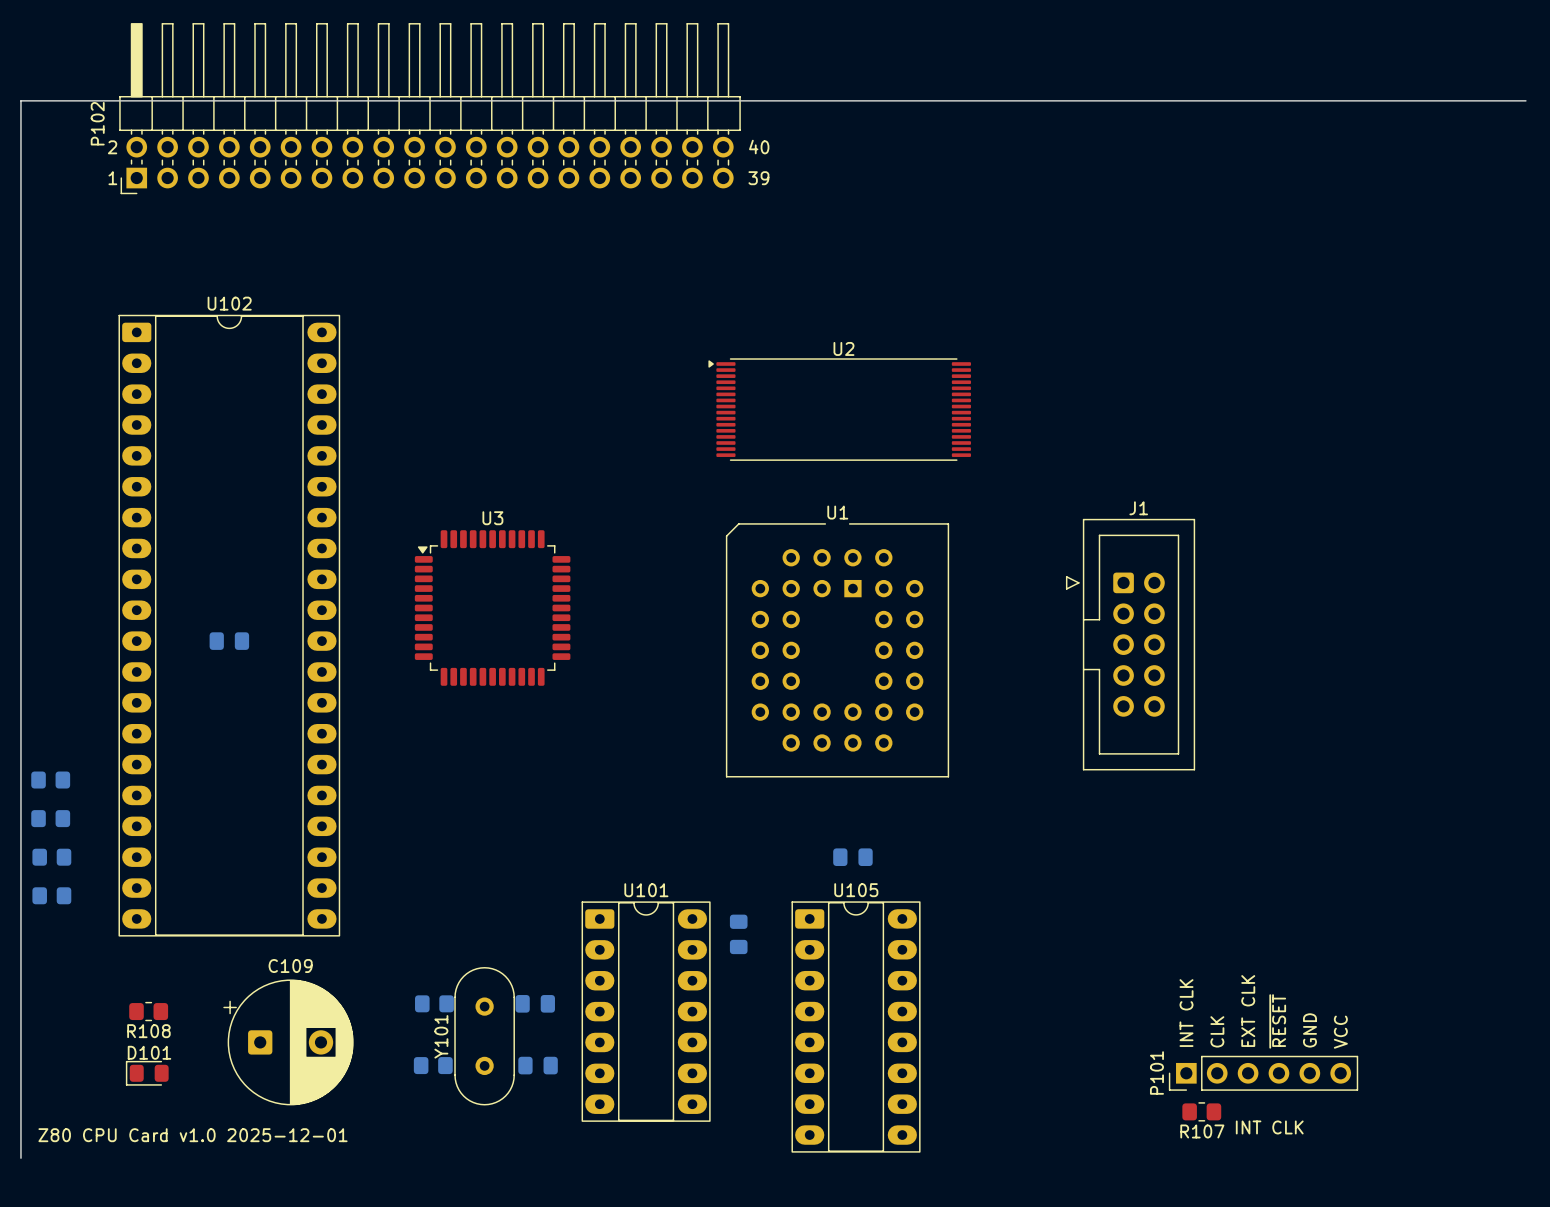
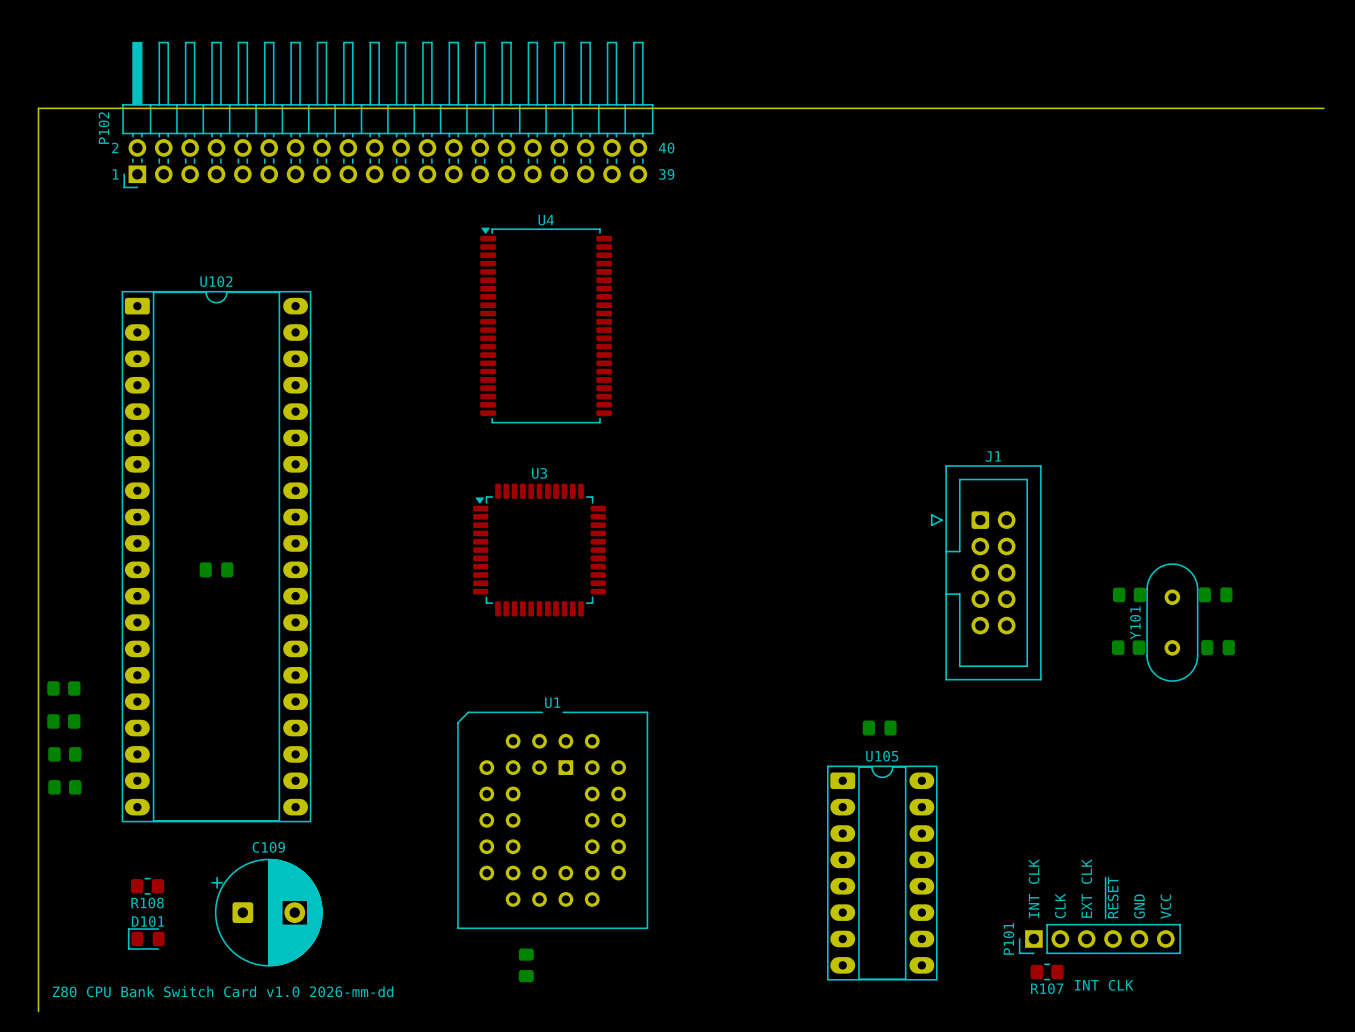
U4: none -> (546, 325)
U2: (839, 409) -> none
U3 position: (492, 608) -> (539, 550)
U1 position: (837, 650) -> (552, 820)
part: none -> (1129, 594)
part: none -> (1215, 594)
part: none -> (1128, 647)
part: none -> (1218, 647)
part: none -> (879, 728)
part: (852, 857) -> none
part: (738, 934) -> none
part: (434, 1003) -> none
part: (535, 1003) -> none
U101: (646, 1011) -> none
U105 position: (856, 1026) -> (882, 873)
Y101 position: (484, 1036) -> (1172, 622)
part: (433, 1065) -> none
part: (538, 1065) -> none
part: none -> (526, 965)
text: Z80 CPU Card v1.0 2025-12-01 (193, 1135) -> Z80 CPU Bank Switch Card v1.0 2026-mm-dd (223, 991)

